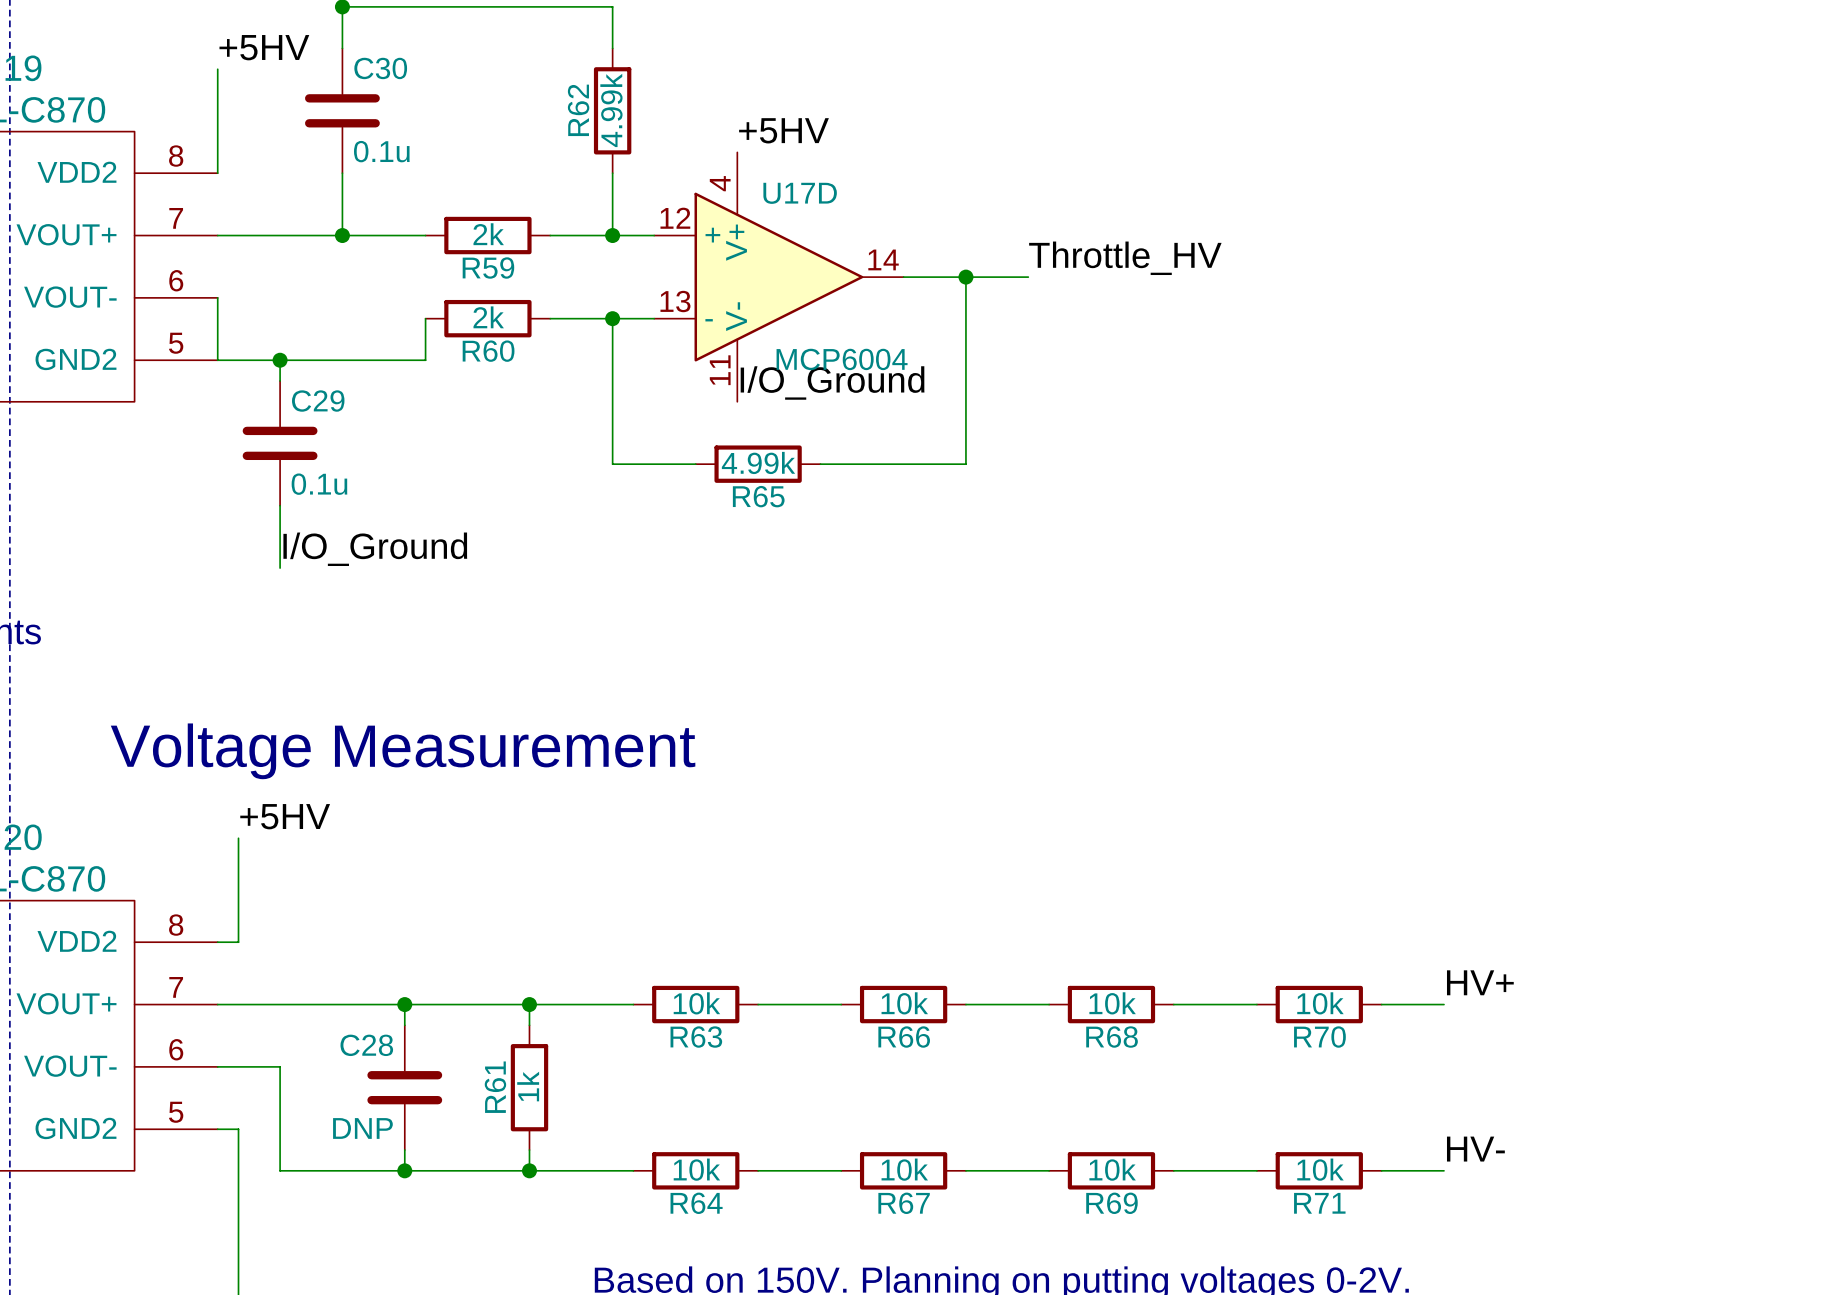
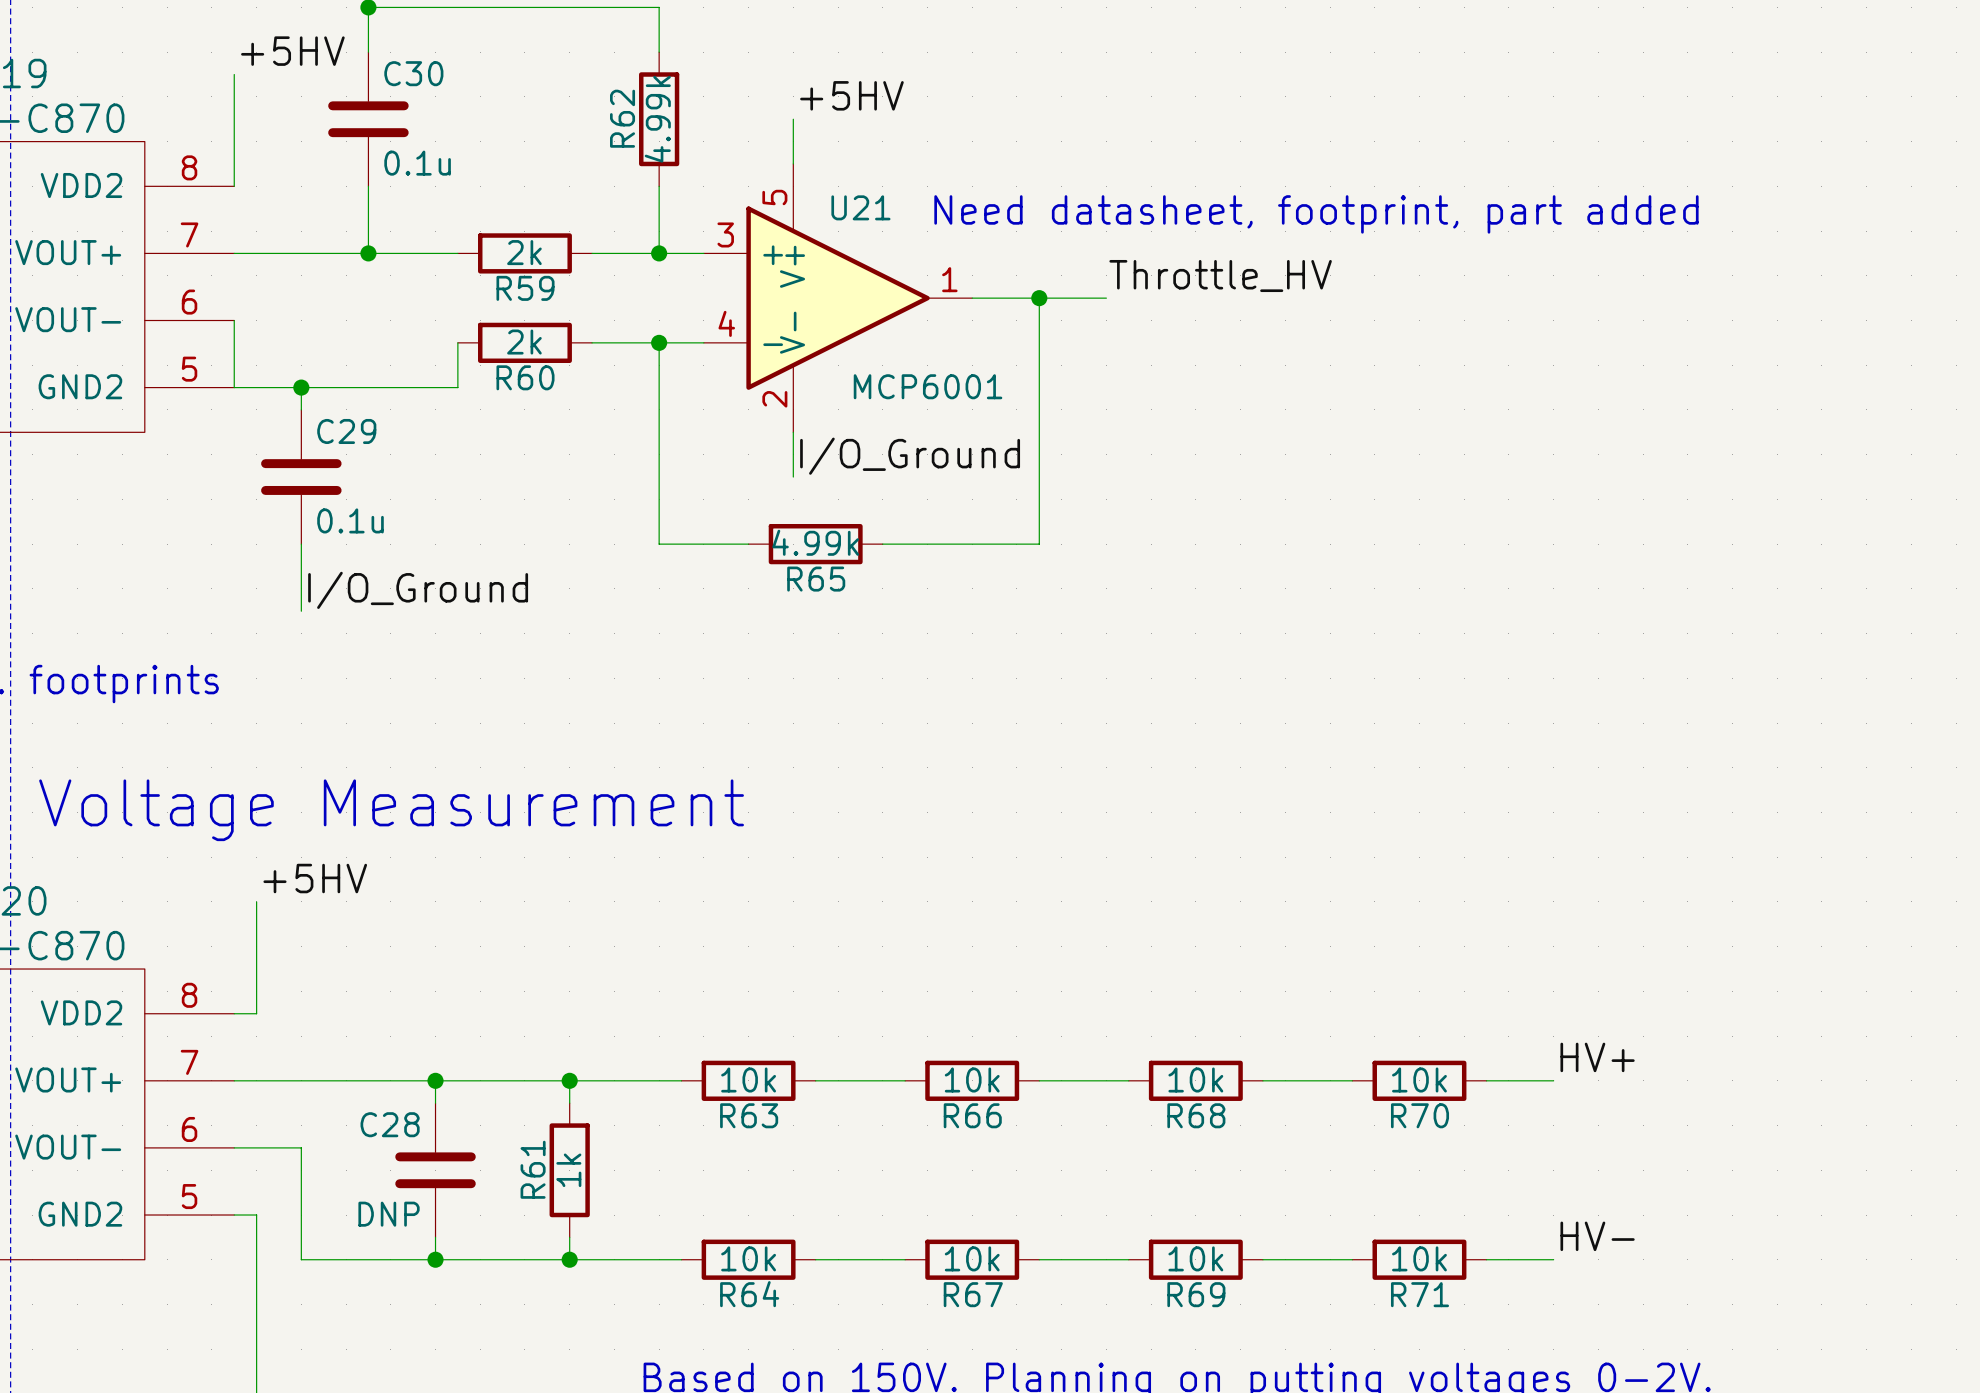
wire: none -> (793, 119) (793, 163)
label position: +5HV (783, 130) -> +5HV (851, 95)
text: none -> Need datasheet, footprint, part added (1316, 214)
U17D: MCP6004 (778, 277) -> none
U21: none -> MCP6001 (838, 298)
label position: I/O_Ground (832, 382) -> I/O_Ground (910, 456)
wire: none -> (793, 432) (793, 477)
wire: (612, 464) (695, 464) -> (659, 499) (659, 544) (748, 544)
R65 position: (758, 464) -> (815, 544)
wire: (820, 464) (965, 464) -> (882, 544) (1039, 544) (1039, 499)

